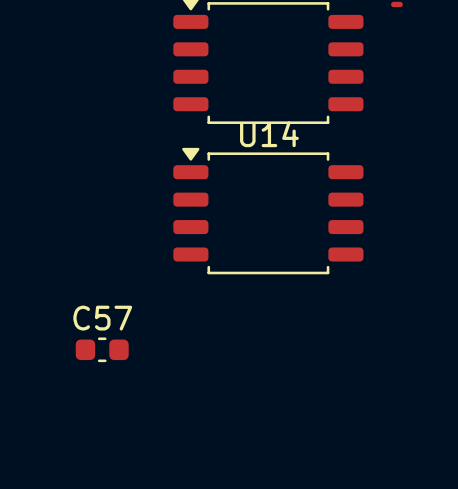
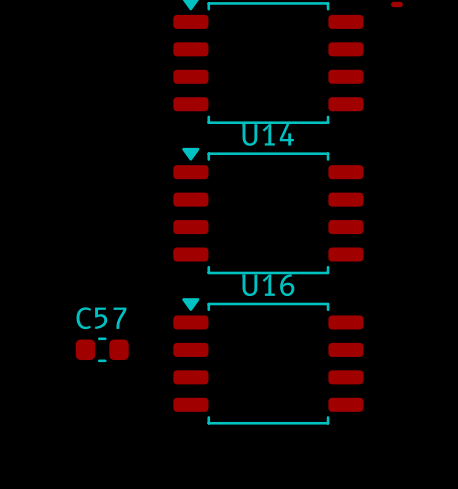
U16: none -> (268, 361)

